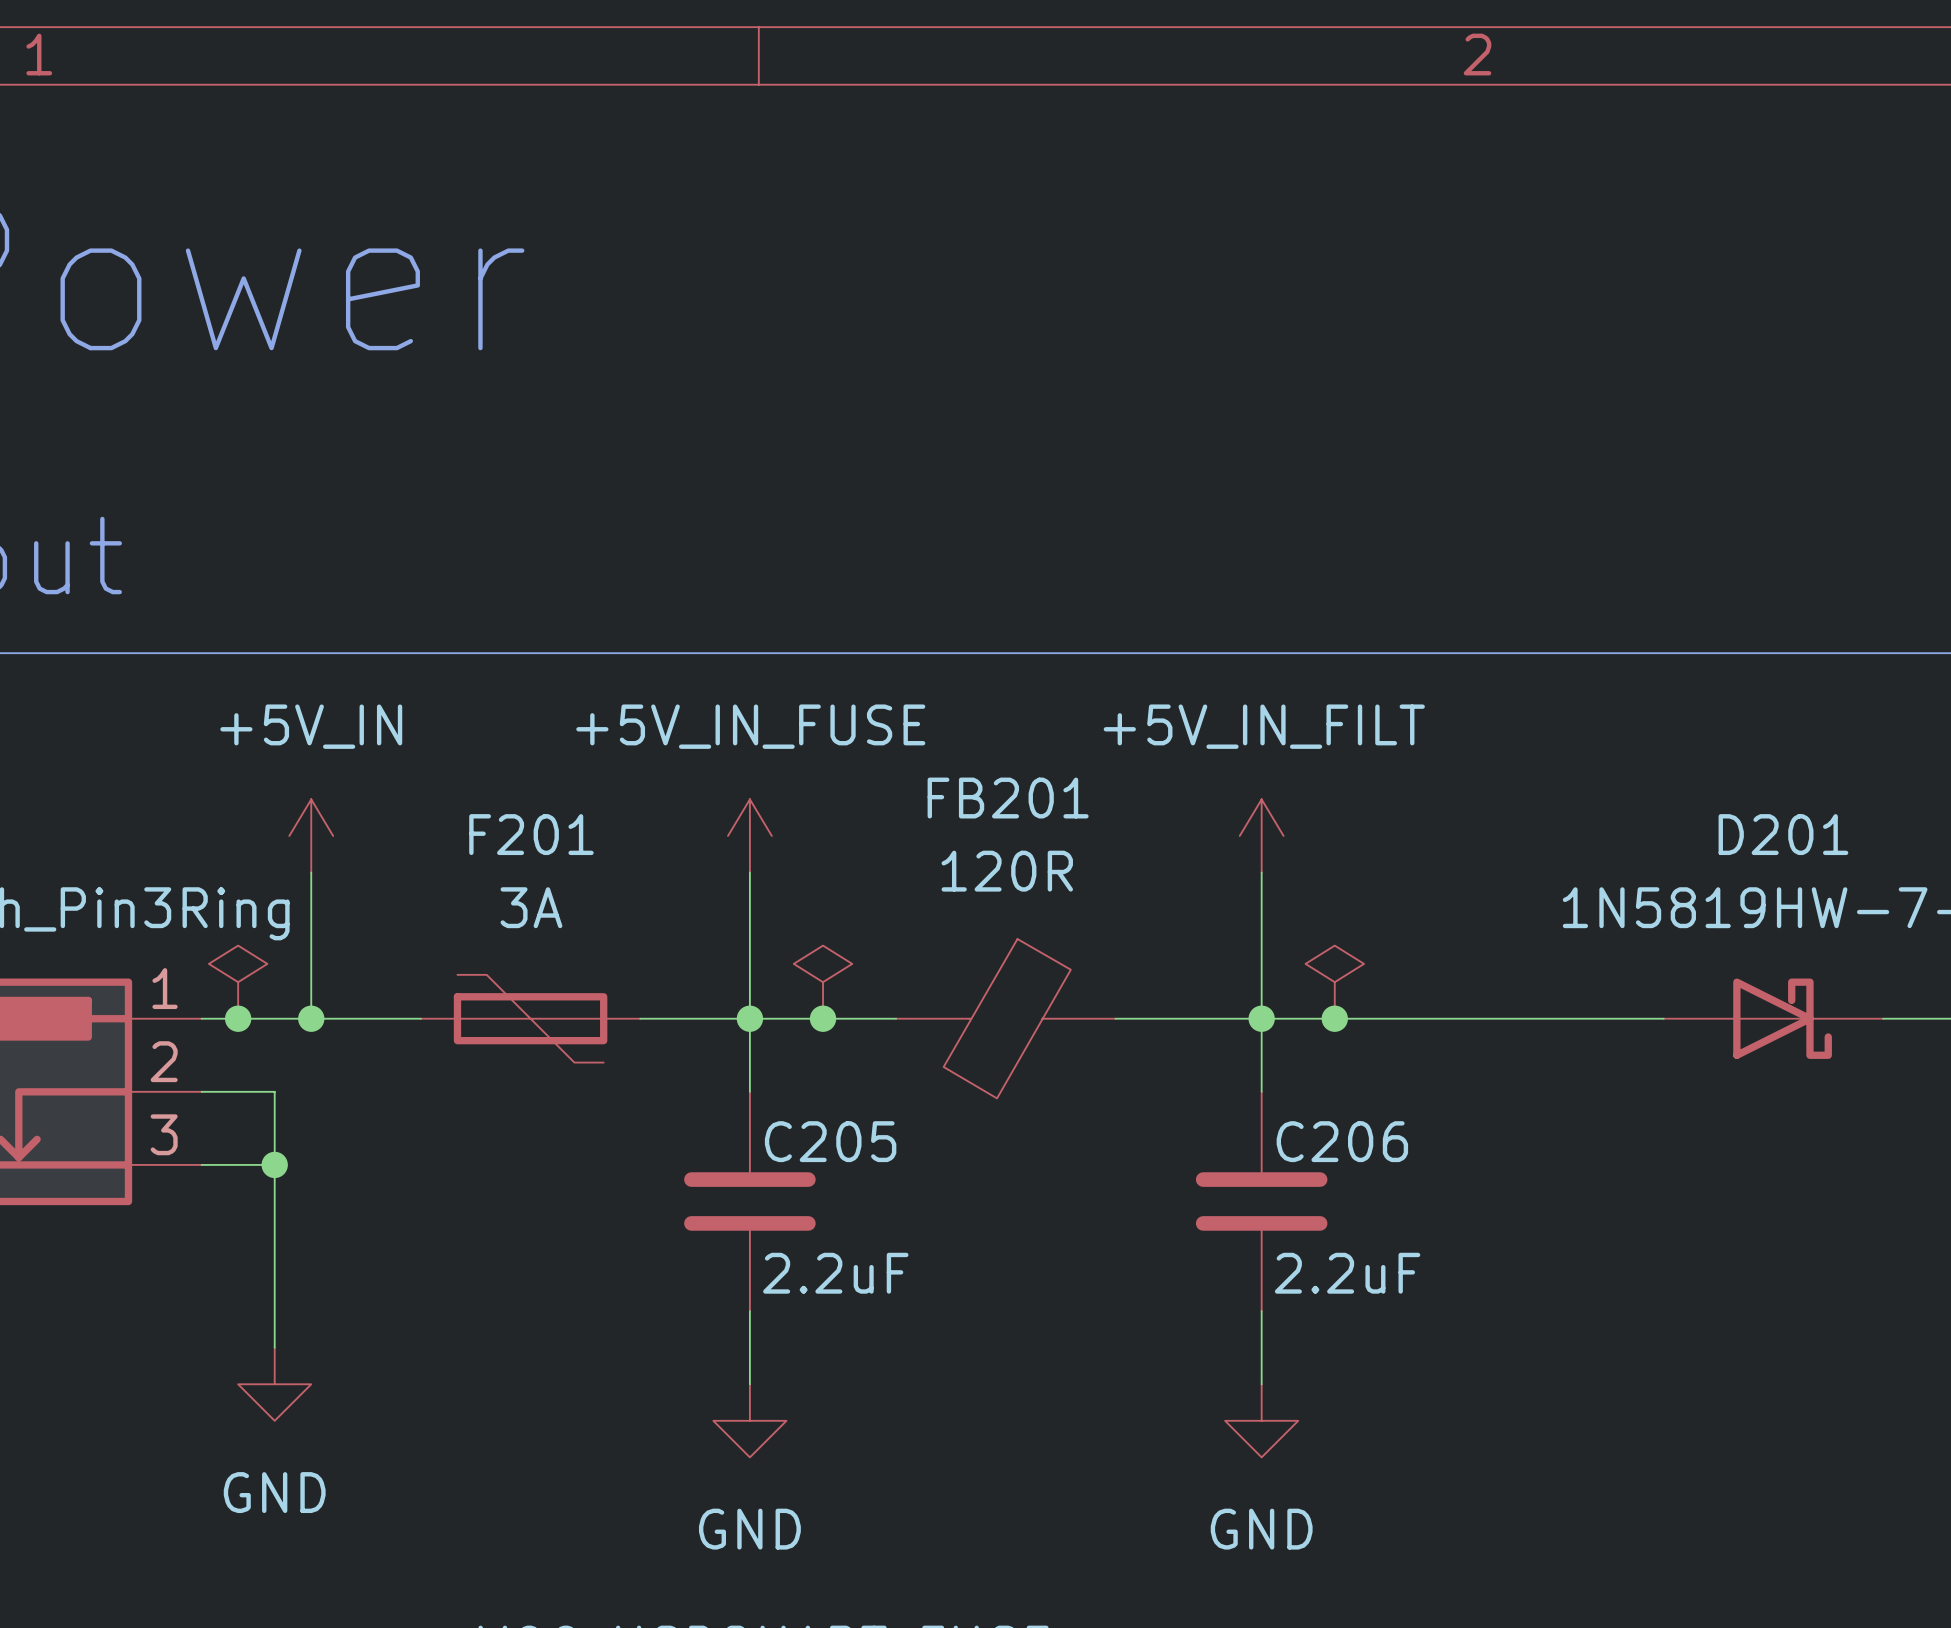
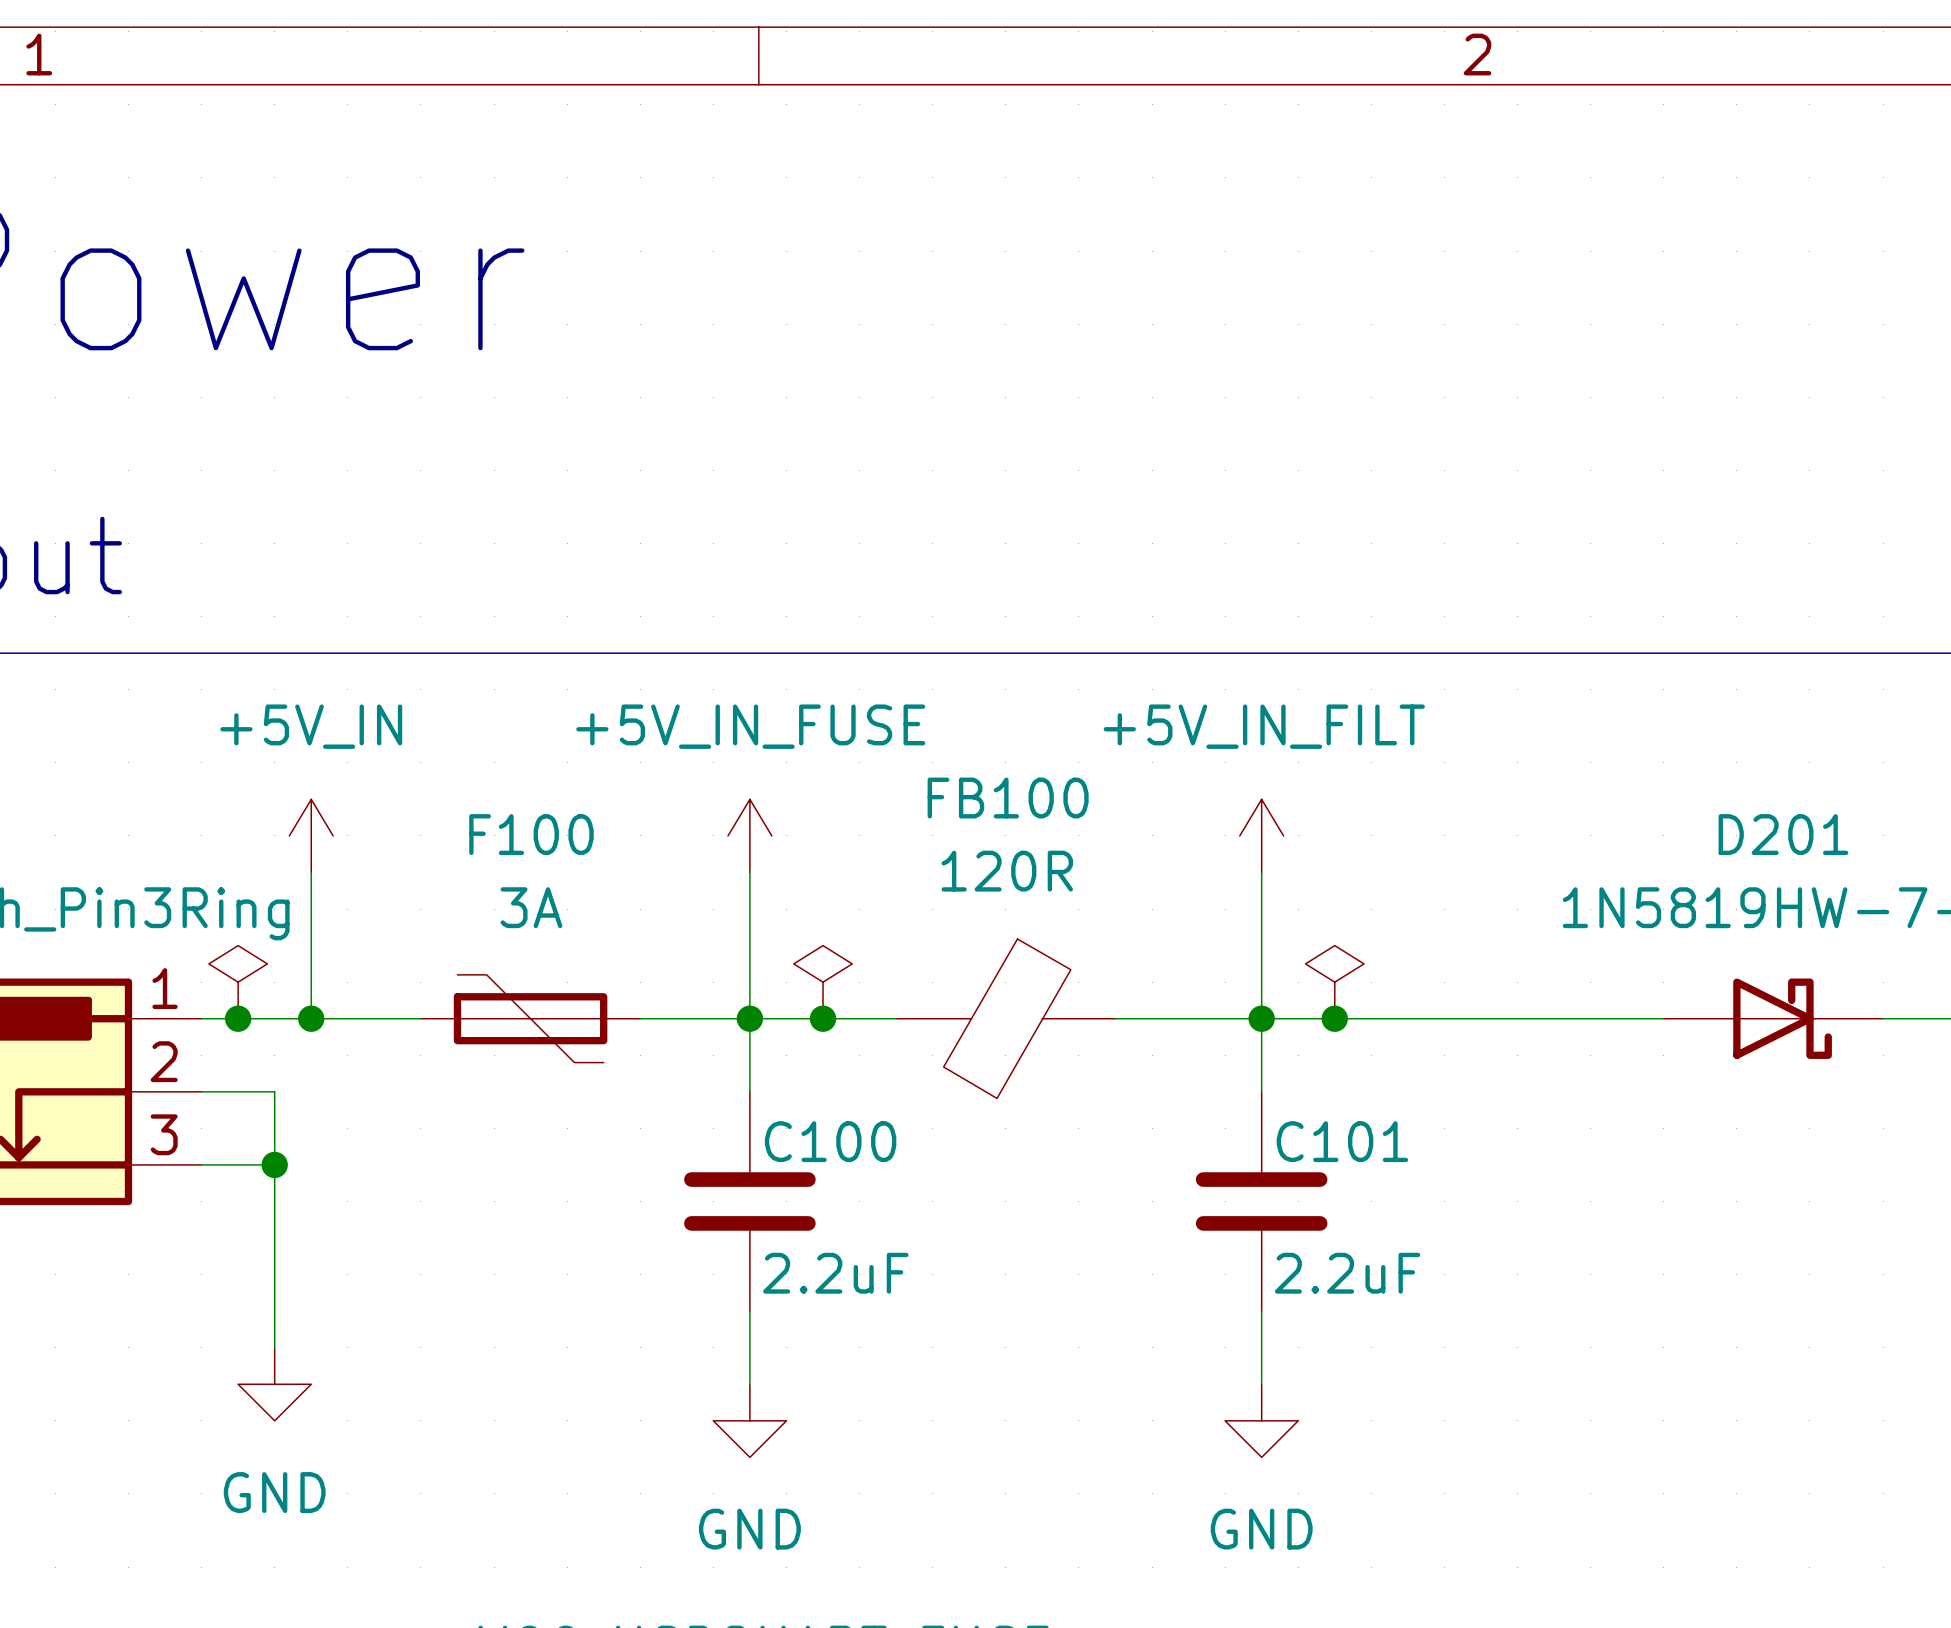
FB201 name: FB201 (1008, 798) -> FB100 (1008, 798)
F201 name: F201 (531, 834) -> F100 (531, 834)
C205 name: C205 (830, 1141) -> C100 (830, 1141)
C206 name: C206 (1342, 1141) -> C101 (1342, 1141)

